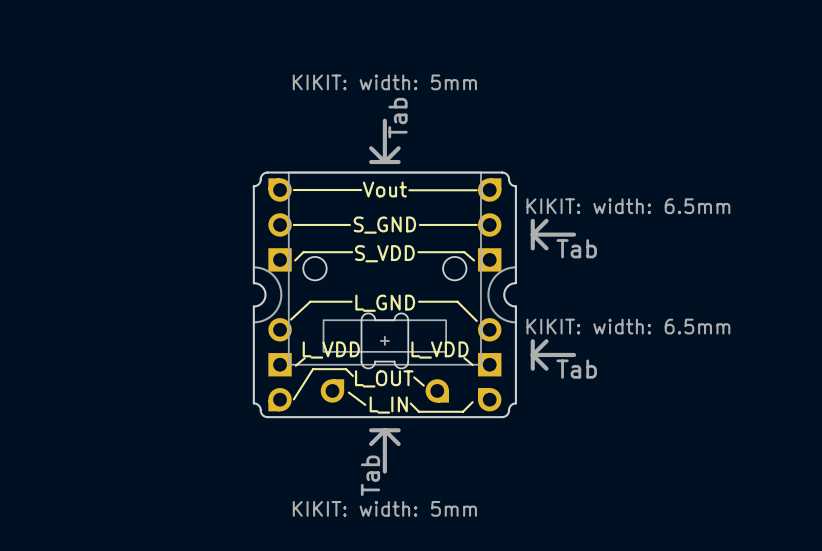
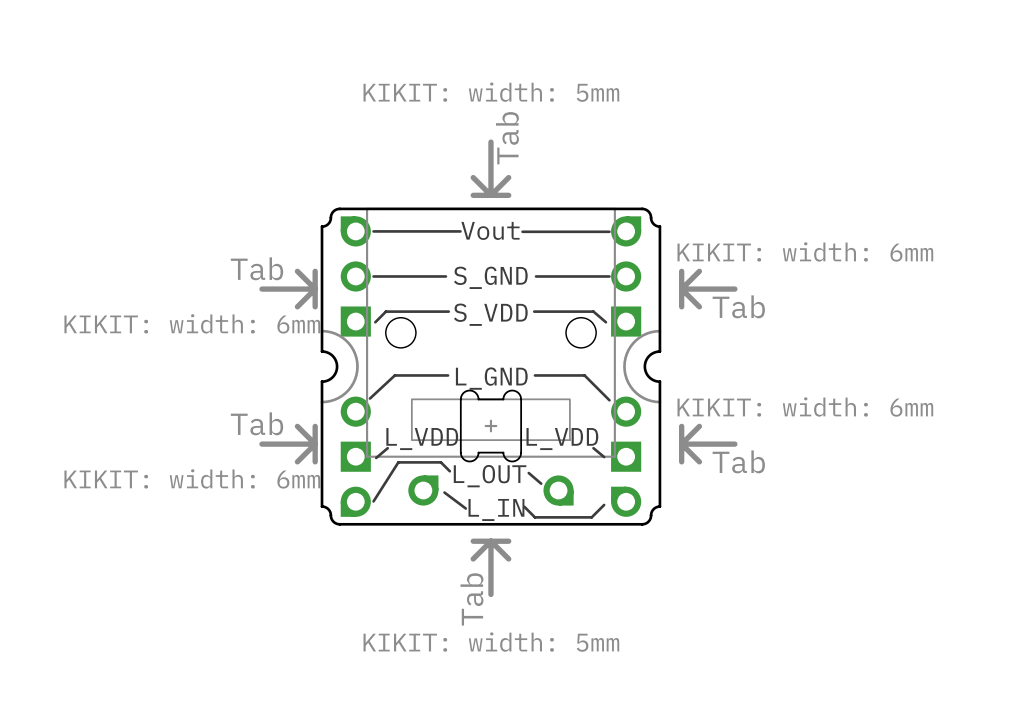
drawing shape: [526, 198, 731, 259] -> [677, 242, 934, 319]
drawing: none -> [259, 268, 318, 310]
drawing shape: [526, 318, 731, 379] -> [677, 397, 934, 474]
drawing: none -> [259, 423, 318, 465]

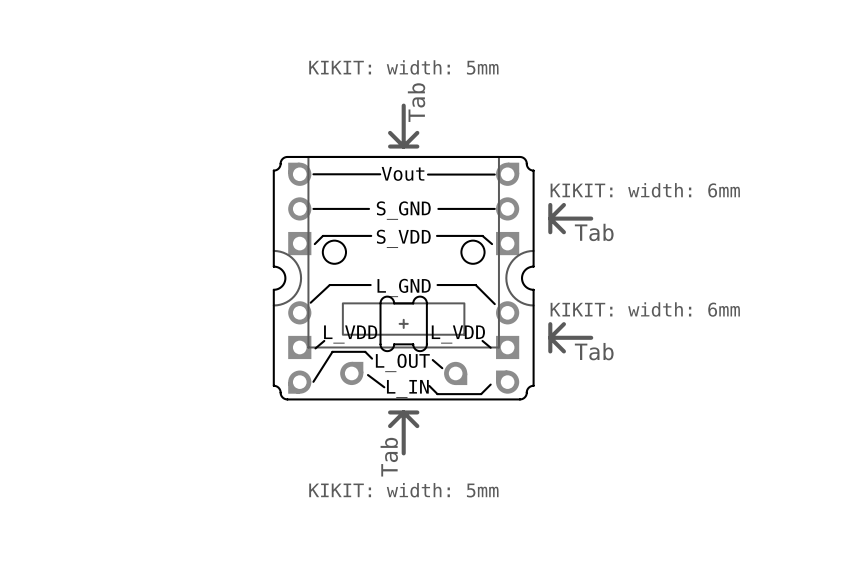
drawing: [259, 268, 318, 310] -> none
drawing: [259, 423, 318, 465] -> none

